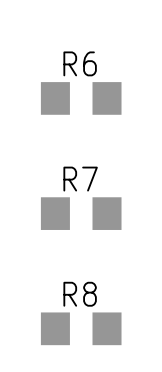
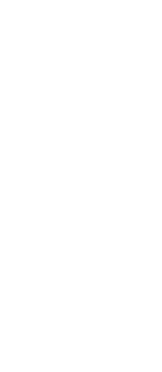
R6: (81, 98) -> none
R7: (81, 213) -> none
R8: (81, 328) -> none

